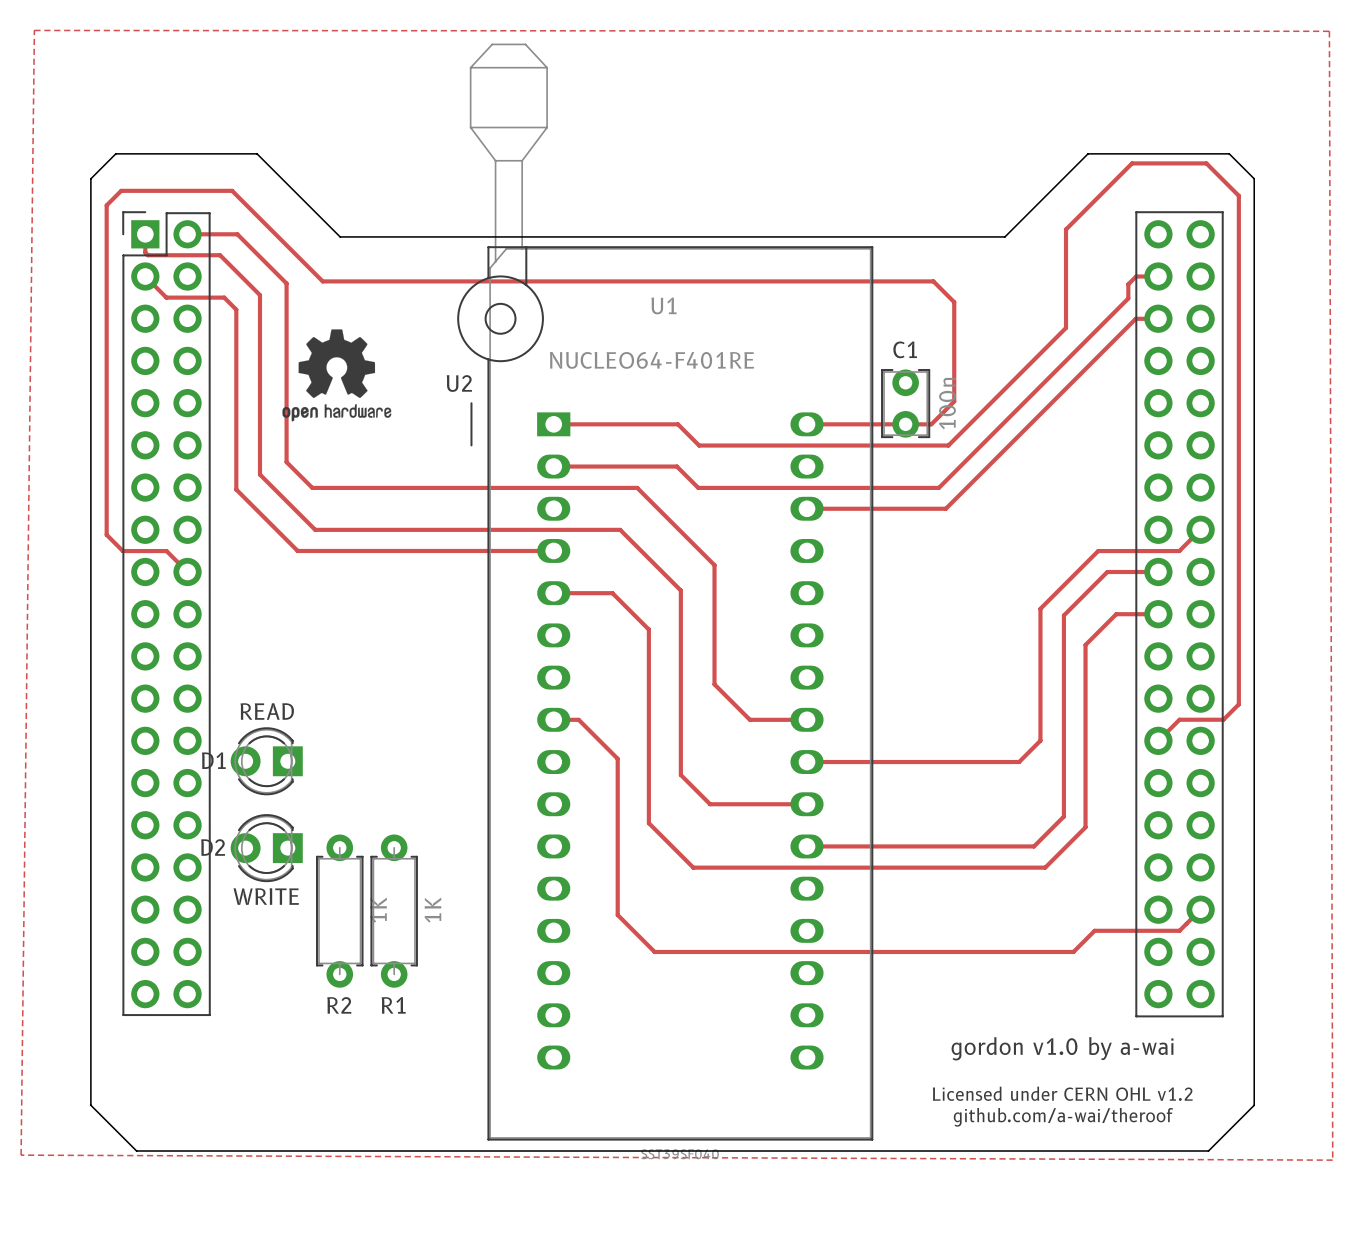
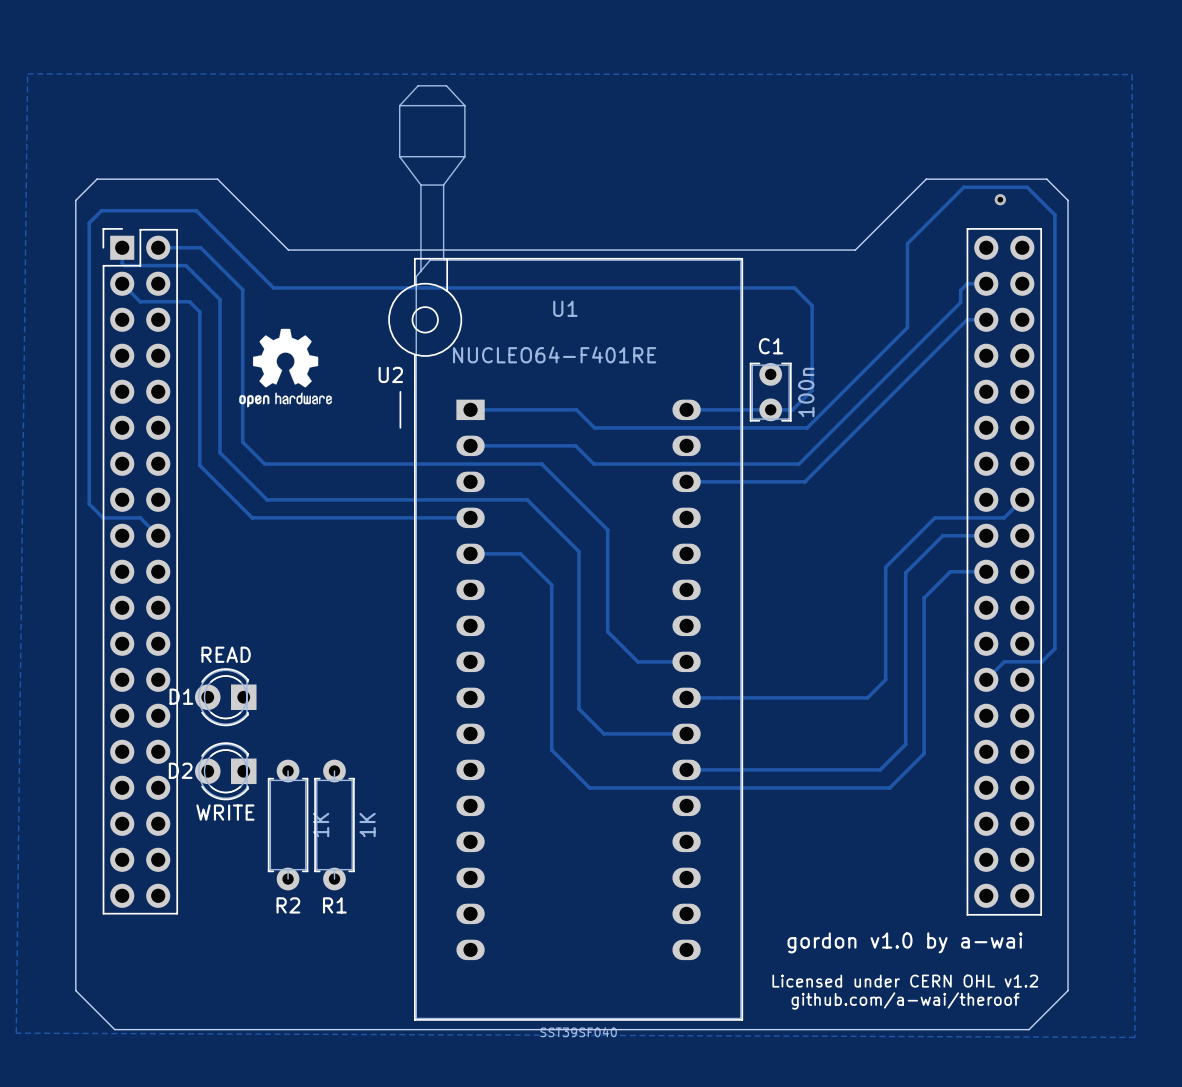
via: none -> (1000, 199)
track: (553, 719) (578, 719) (617, 758) (617, 915) (654, 951) (1073, 951) (1094, 930) (1179, 930) (1200, 909) -> none

